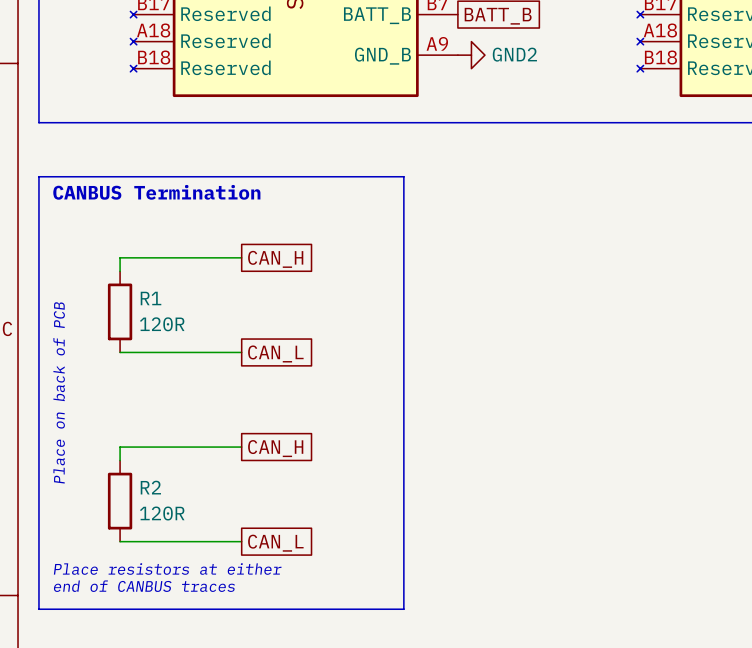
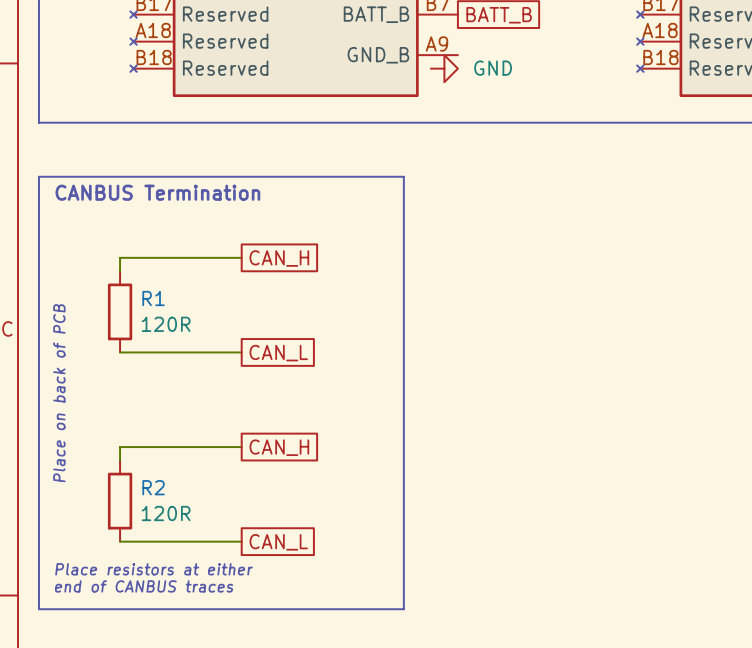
power symbol: GND2 (471, 55) -> none
power symbol: none -> GND (444, 68)

